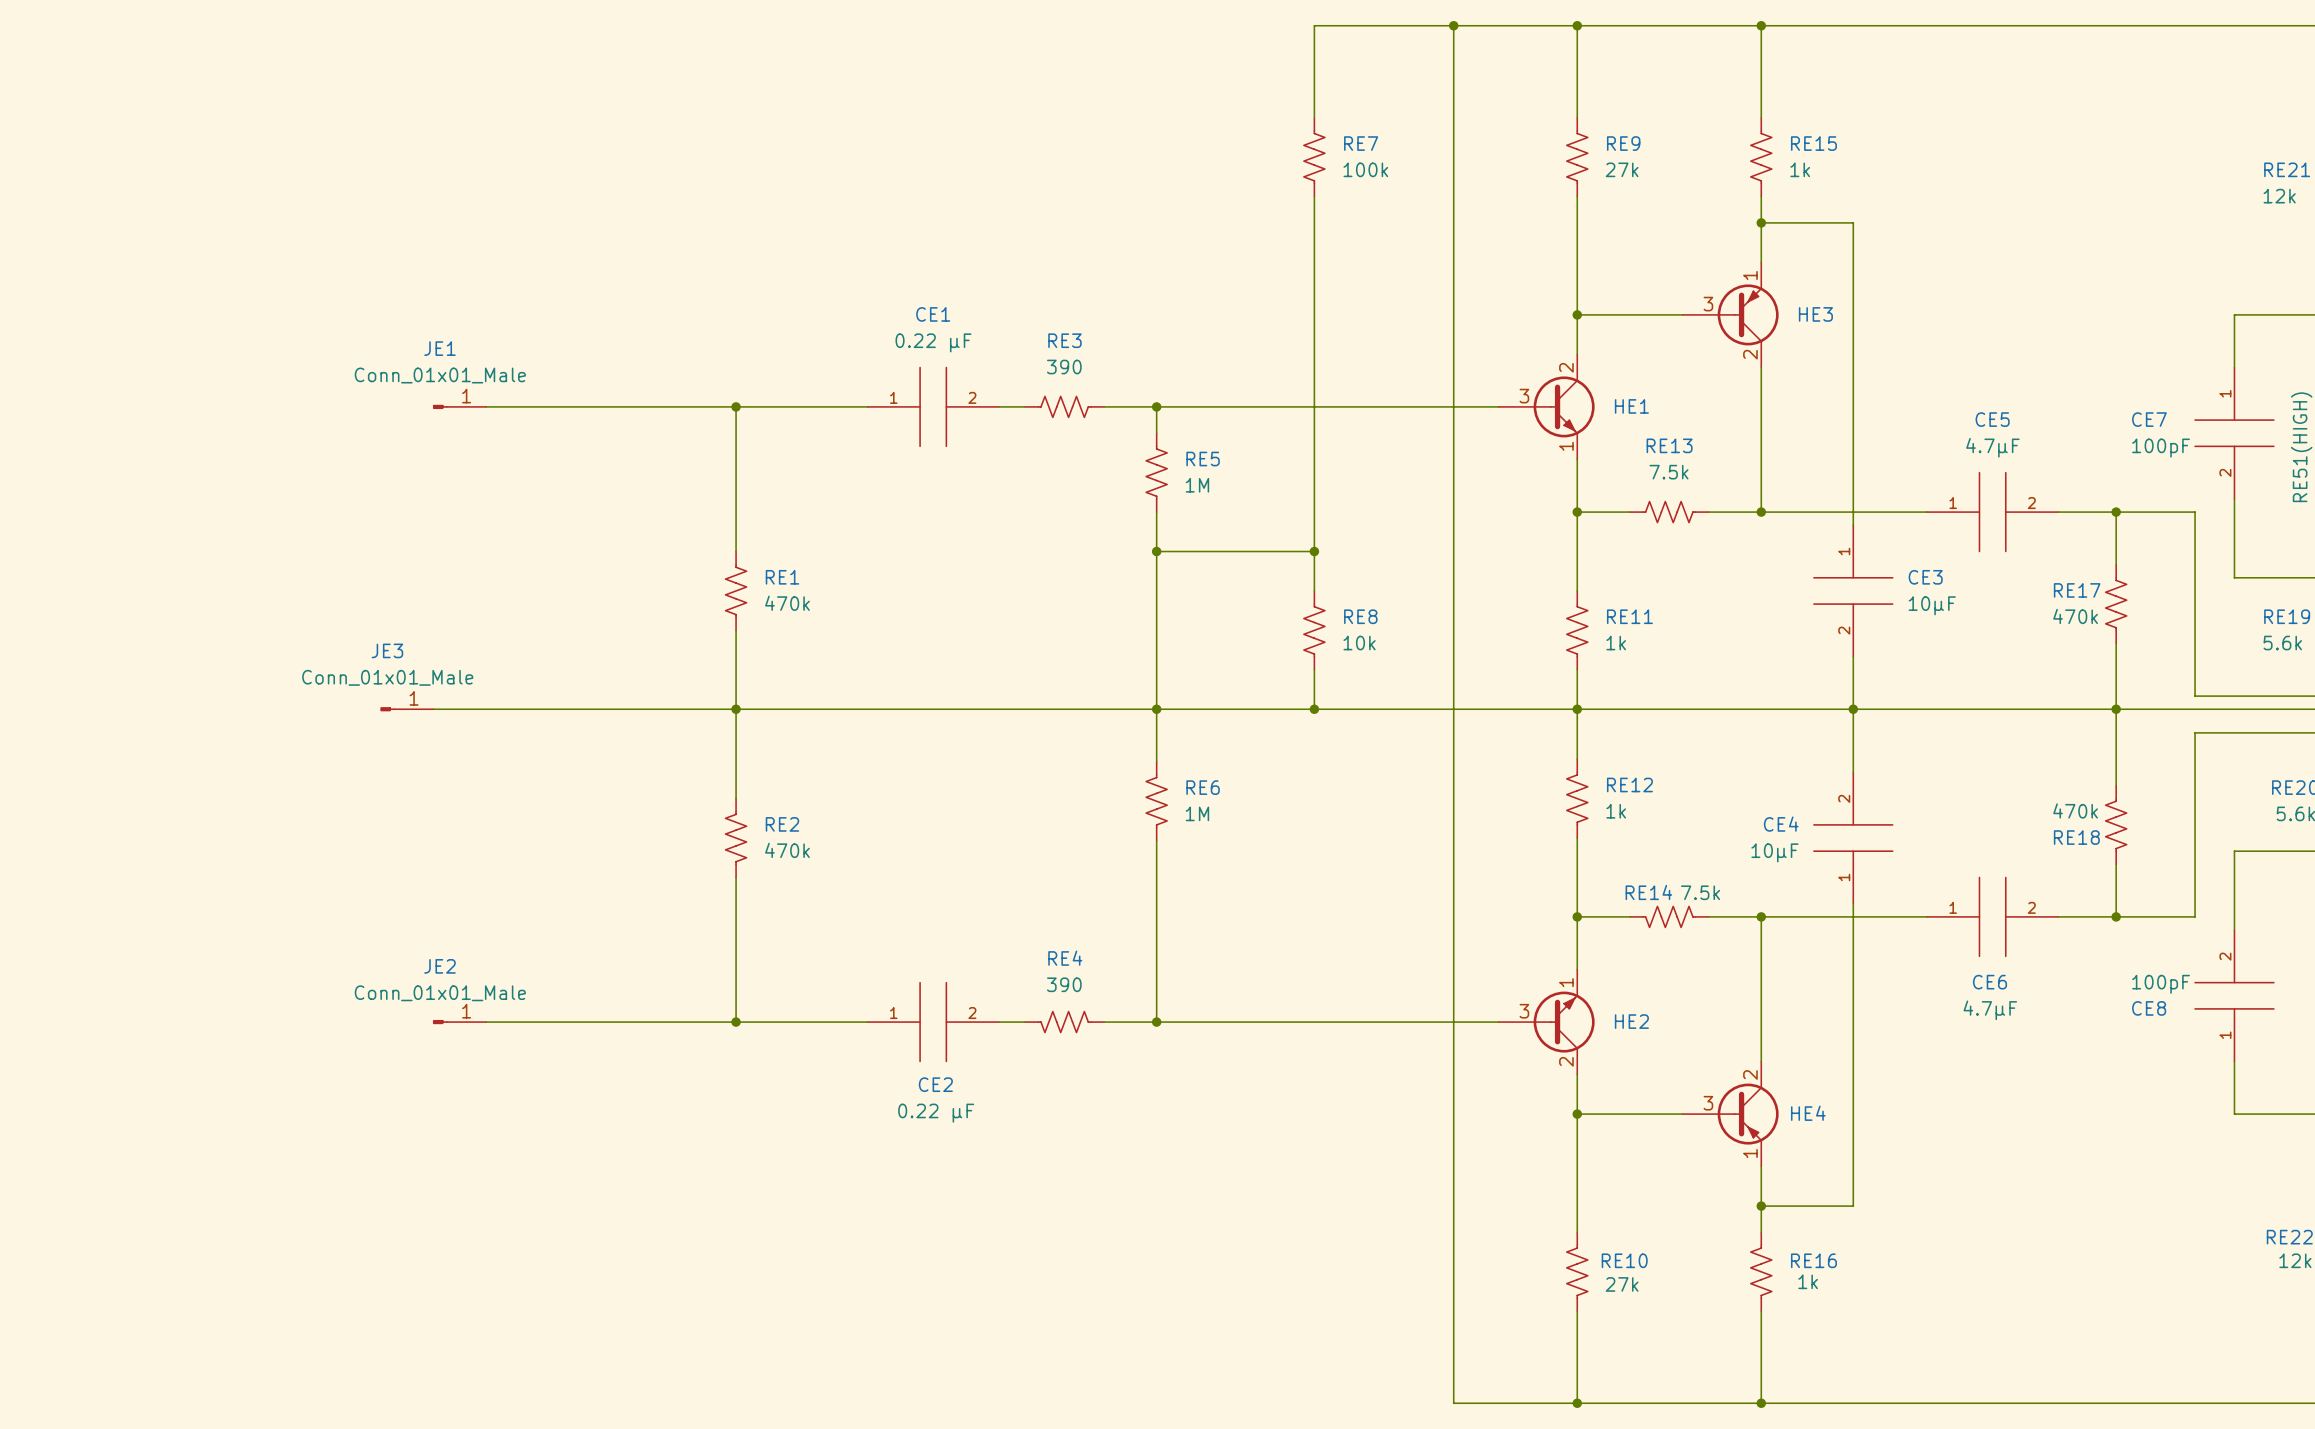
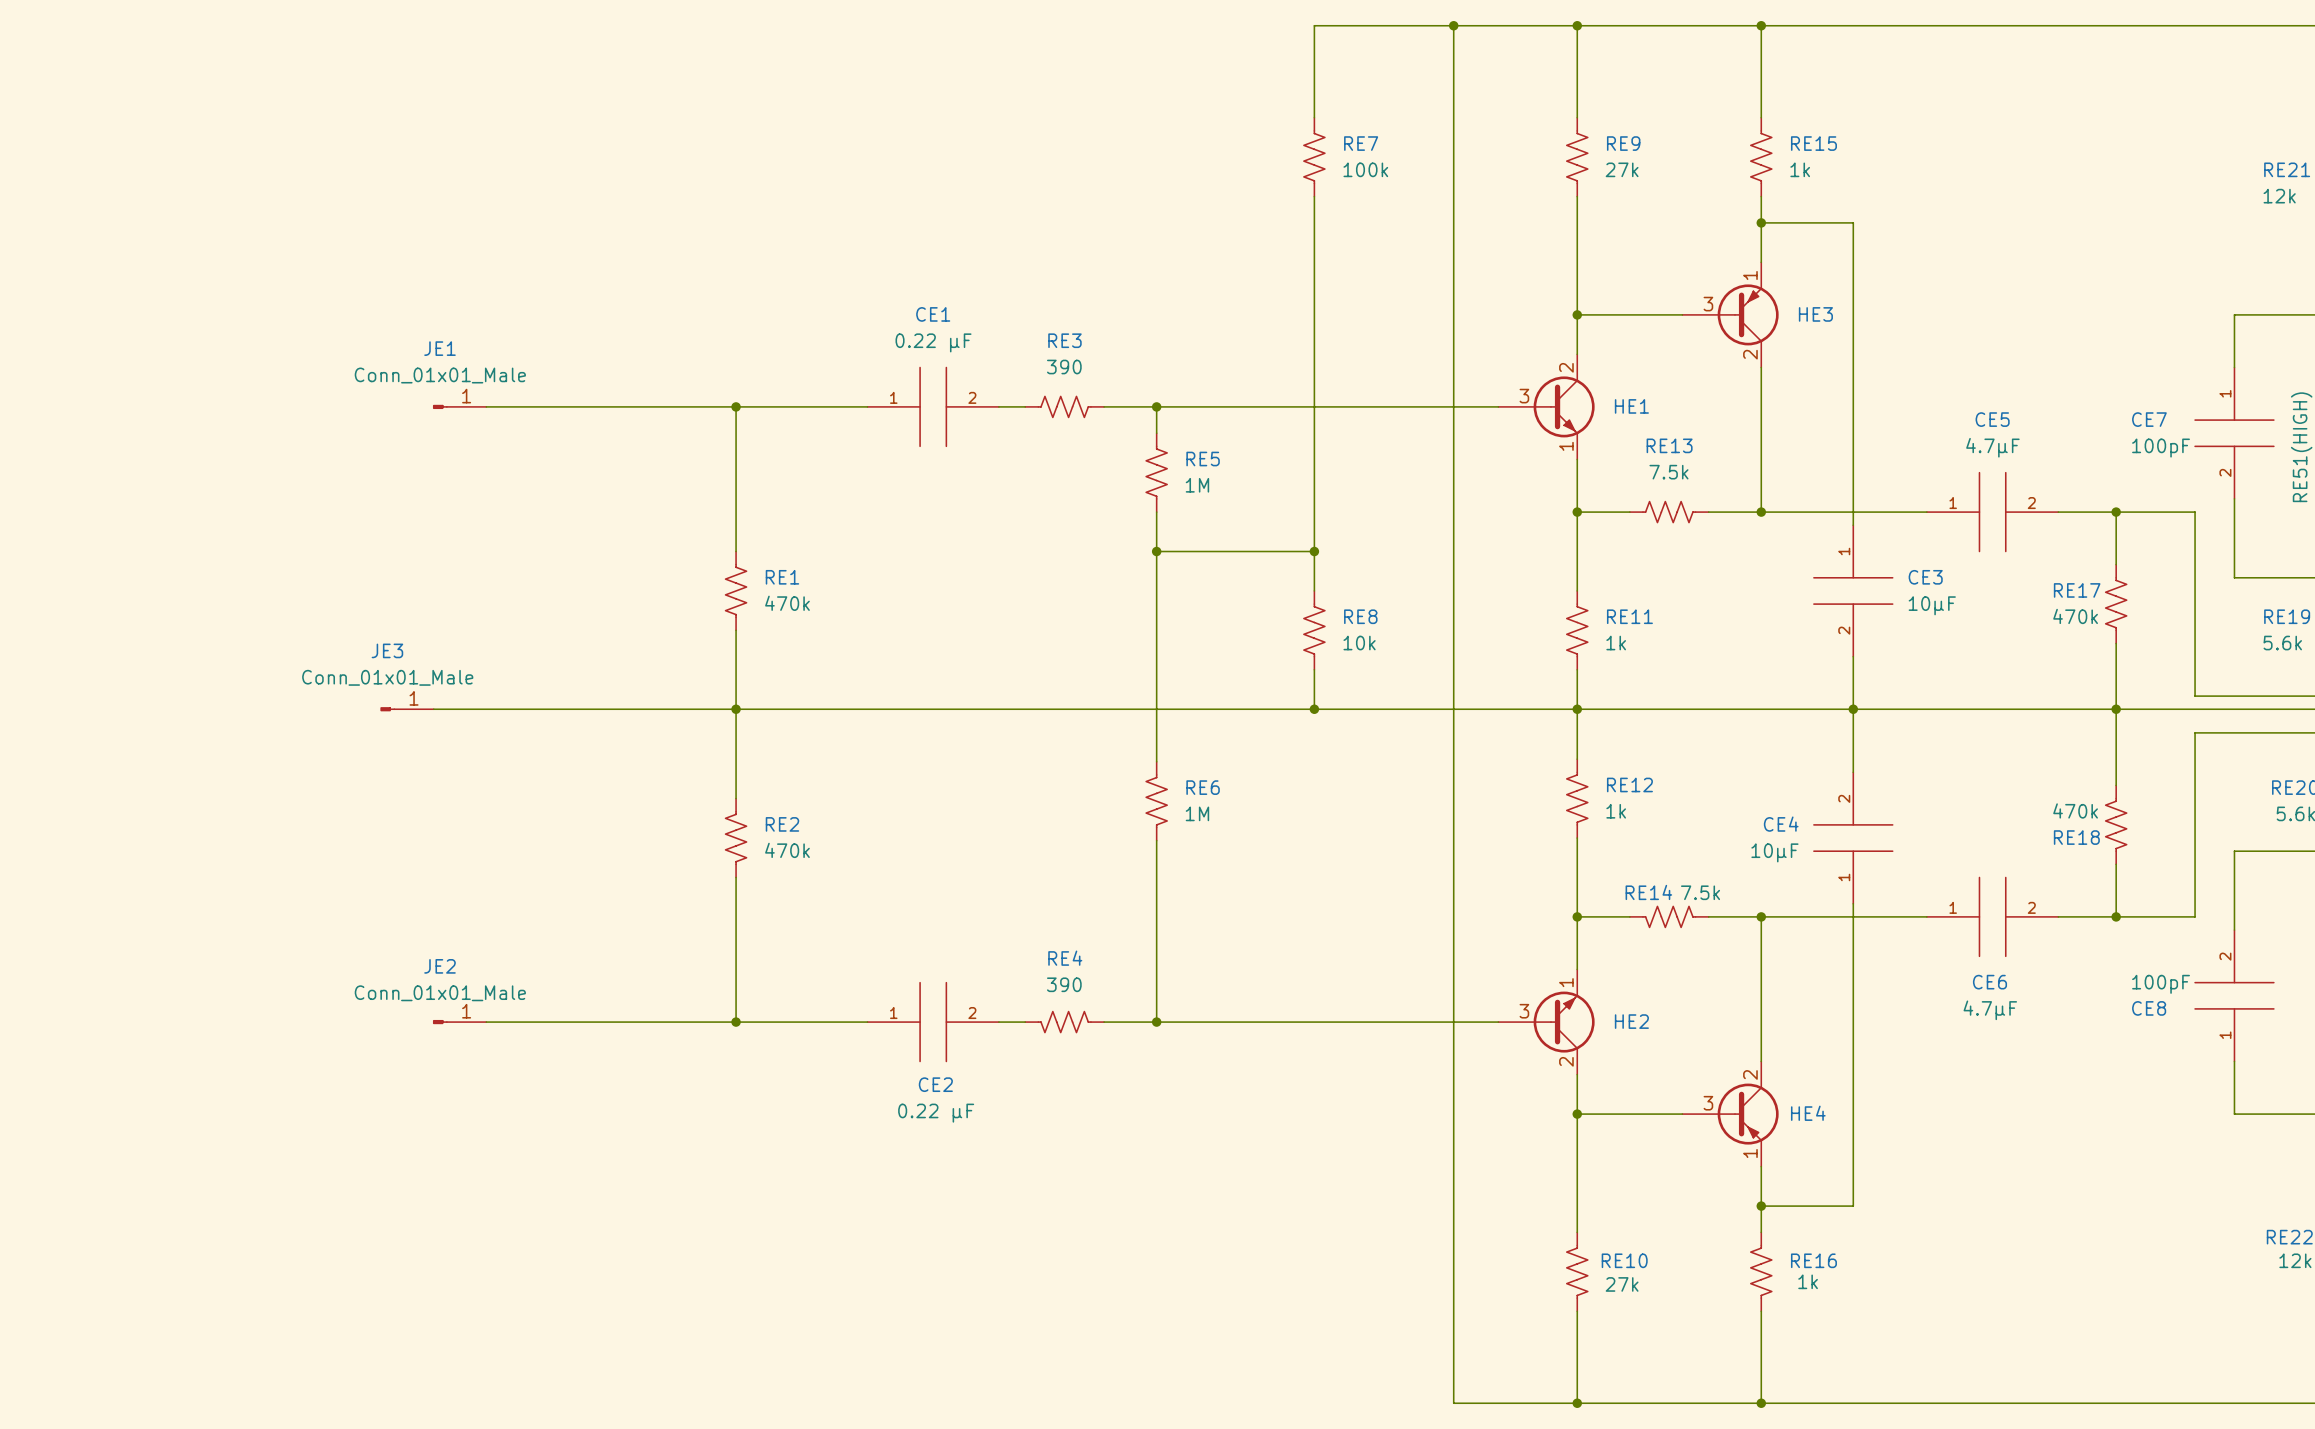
junction: (1156, 709) -> none

